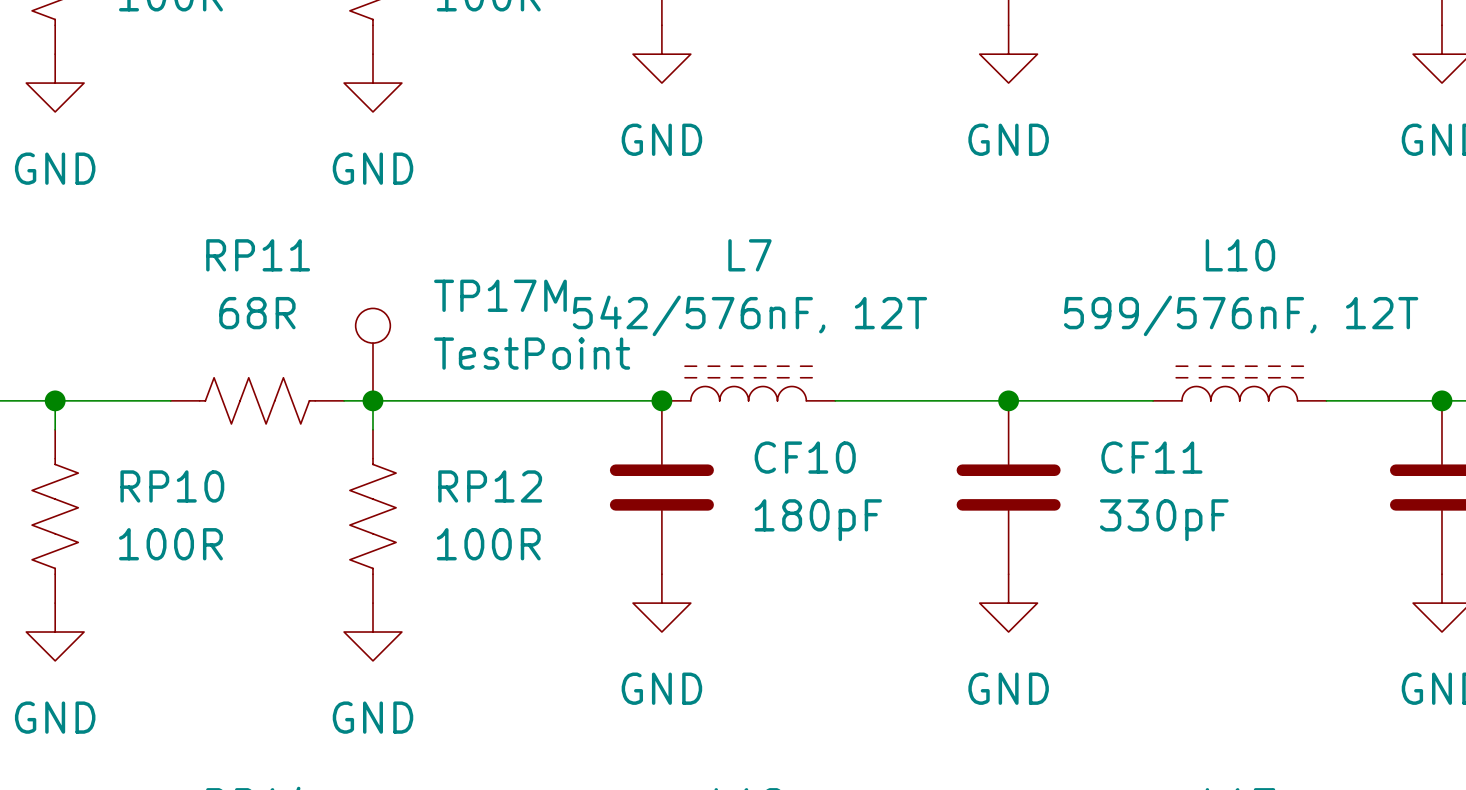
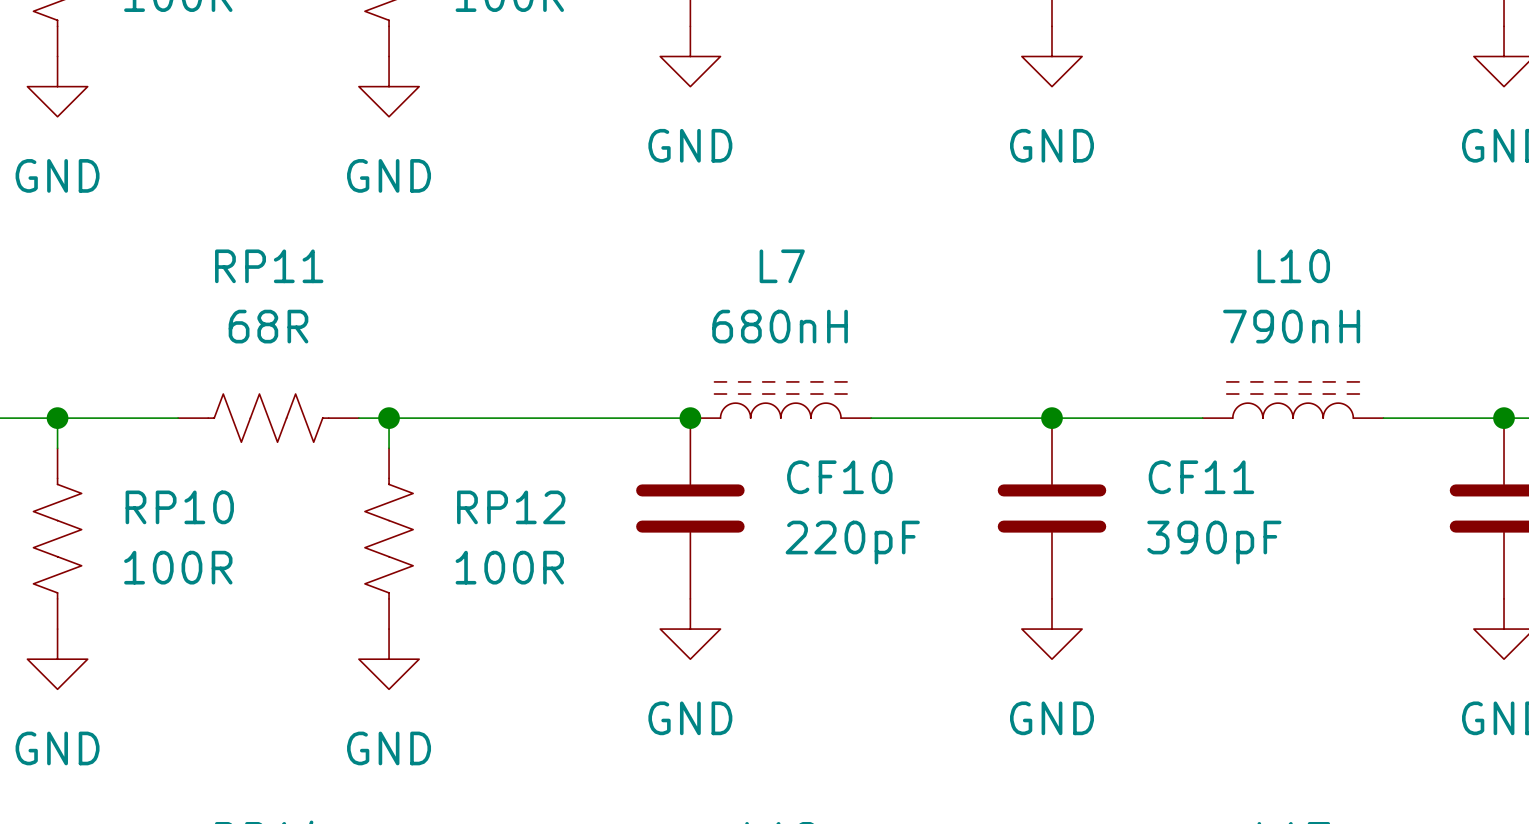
L7 value: 542/576nF, 12T (749, 315) -> 680nH (780, 326)
L10 value: 599/576nF, 12T (1241, 315) -> 790nH (1291, 326)
TP17M: TestPoint (372, 354) -> none
CF10 value: 180pF (818, 520) -> 220pF (852, 542)
CF11 value: 330pF (1164, 520) -> 390pF (1214, 542)

